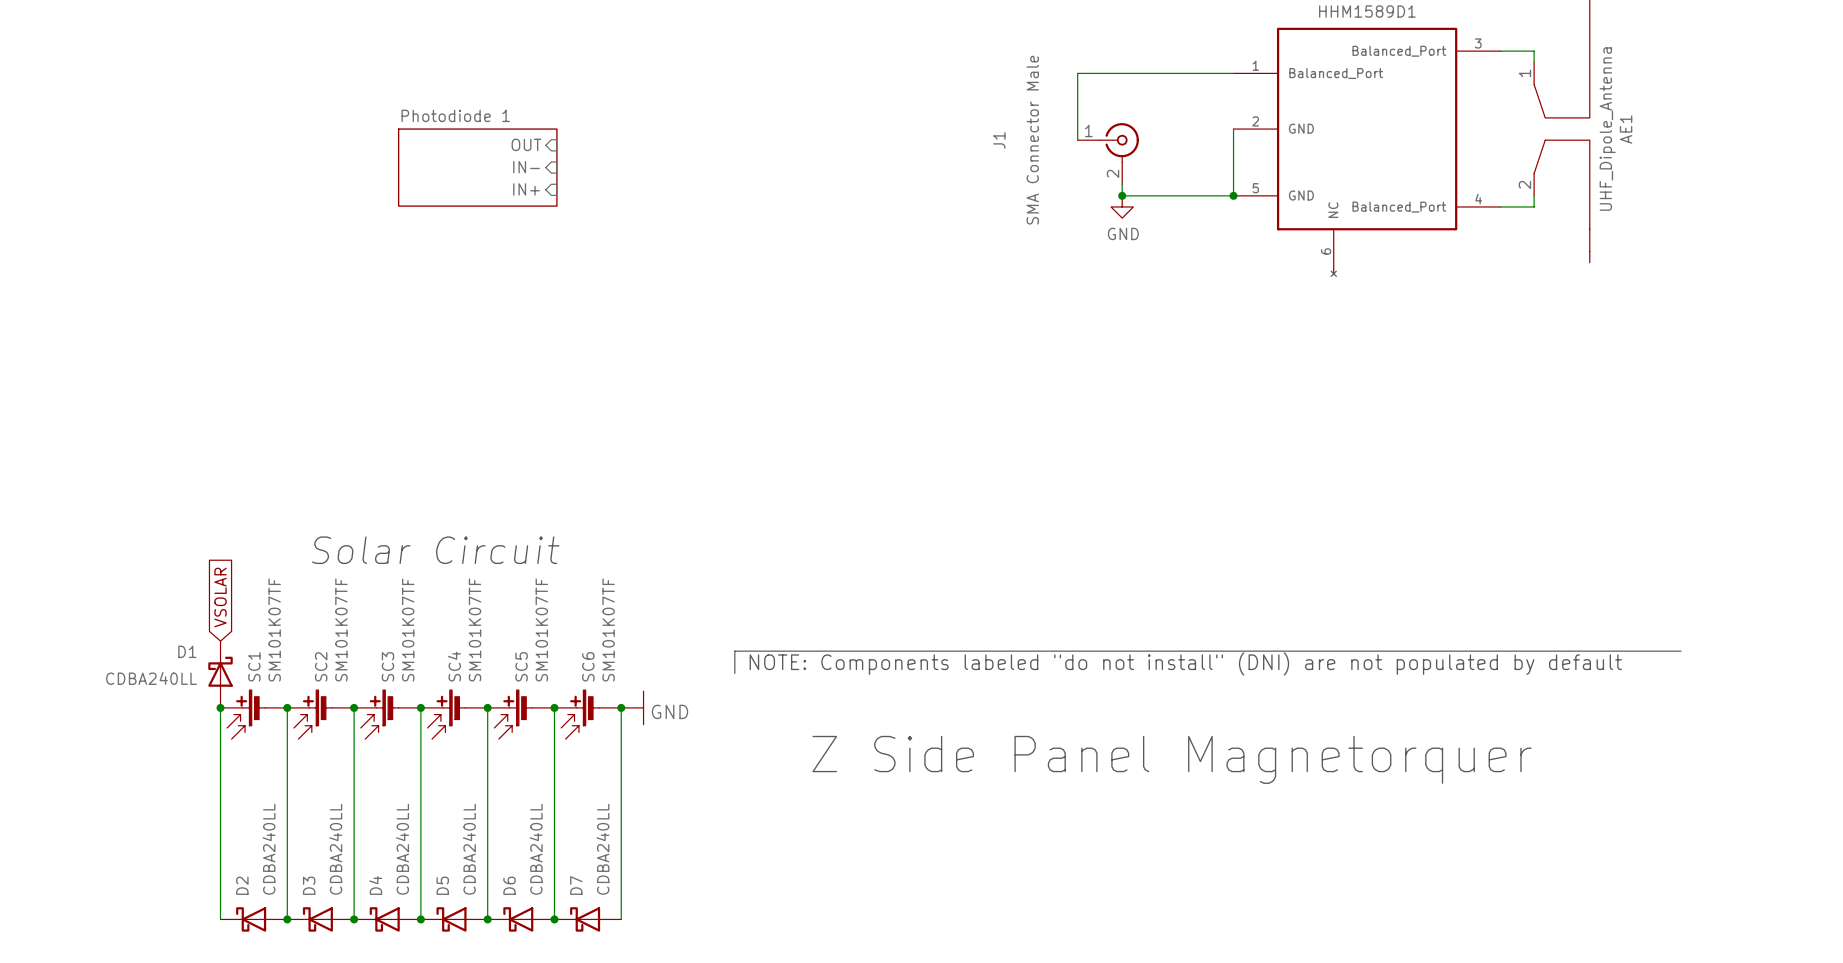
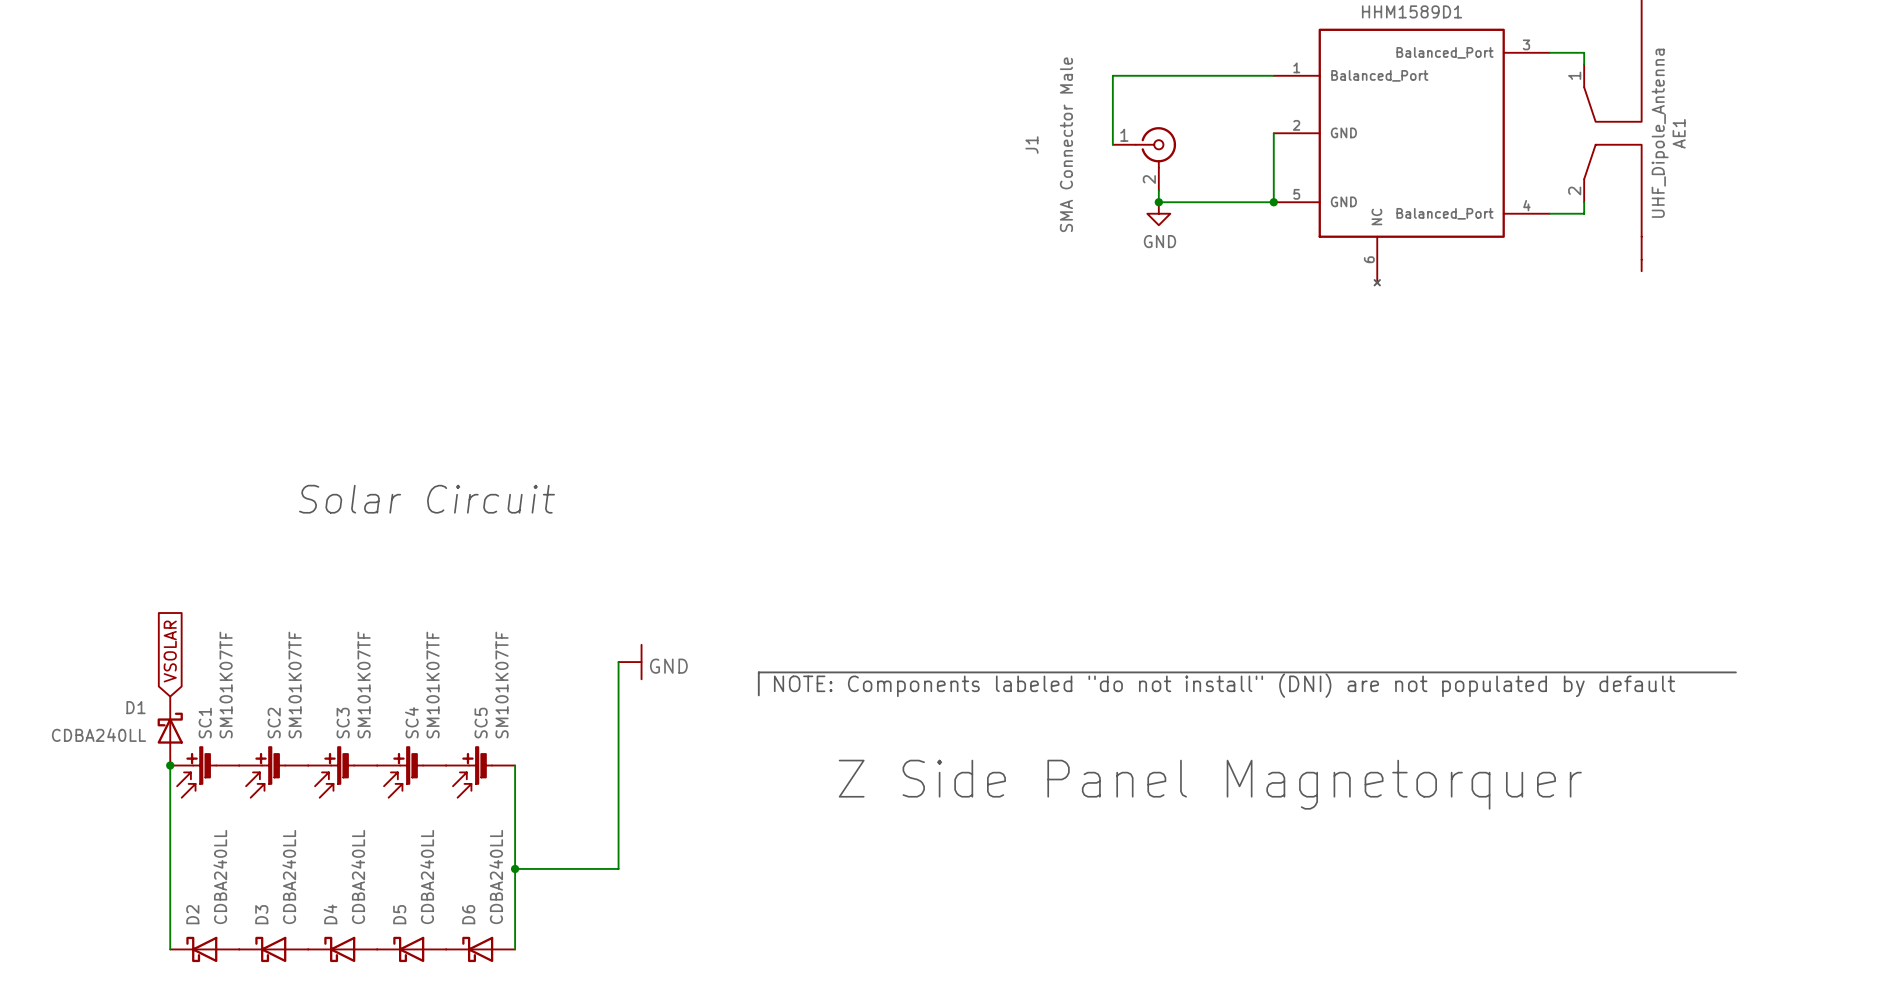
sheet pin: OUT (526, 144) -> none
sheet Photodiode 1: (477, 167) -> none
sheet pin: IN- (526, 167) -> none
sheet pin: IN+ (526, 189) -> none
text position: Solar Circuit (435, 550) -> Solar Circuit (426, 499)
global label position: VSOLAR (220, 597) -> VSOLAR (170, 651)
wire: none -> (618, 662) (618, 868) (515, 868)
D1 position: (220, 674) -> (170, 731)
wire: (220, 707) (220, 919) -> none
junction: (220, 707) -> none
wire: (287, 707) (287, 919) -> none
junction: (287, 707) -> none
wire: (354, 707) (354, 919) -> none
junction: (354, 707) -> none
wire: (420, 707) (420, 919) -> none
junction: (420, 707) -> none
wire: (487, 707) (487, 919) -> none
junction: (487, 707) -> none
wire: (554, 707) (554, 919) -> none
junction: (554, 707) -> none
wire: (621, 707) (621, 919) -> none
junction: (621, 707) -> none
power symbol position: GND (632, 707) -> GND (630, 662)
SC1 position: (253, 714) -> (204, 772)
SC2 position: (320, 714) -> (273, 772)
SC3 position: (387, 714) -> (342, 772)
SC4 position: (454, 714) -> (411, 772)
SC5 position: (521, 714) -> (480, 772)
SC6: SM101K07TF (587, 714) -> none
wire: none -> (170, 765) (170, 949)
junction: none -> (170, 765)
wire: none -> (515, 765) (515, 949)
junction: none -> (515, 868)
D2 position: (253, 919) -> (204, 949)
junction: (287, 919) -> none
D3 position: (320, 919) -> (273, 949)
junction: (354, 919) -> none
D4 position: (387, 919) -> (342, 949)
junction: (420, 919) -> none
D5 position: (454, 919) -> (411, 949)
junction: (487, 919) -> none
D6 position: (521, 919) -> (480, 949)
junction: (554, 919) -> none
D7: CDBA240LL (587, 919) -> none

